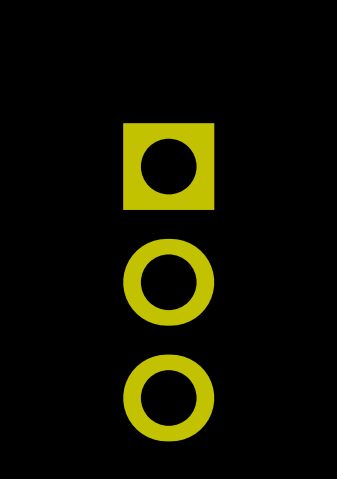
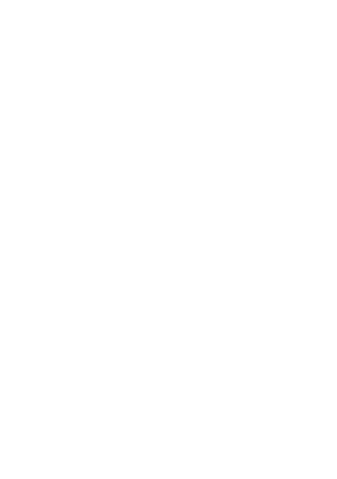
part: (168, 282) -> none

